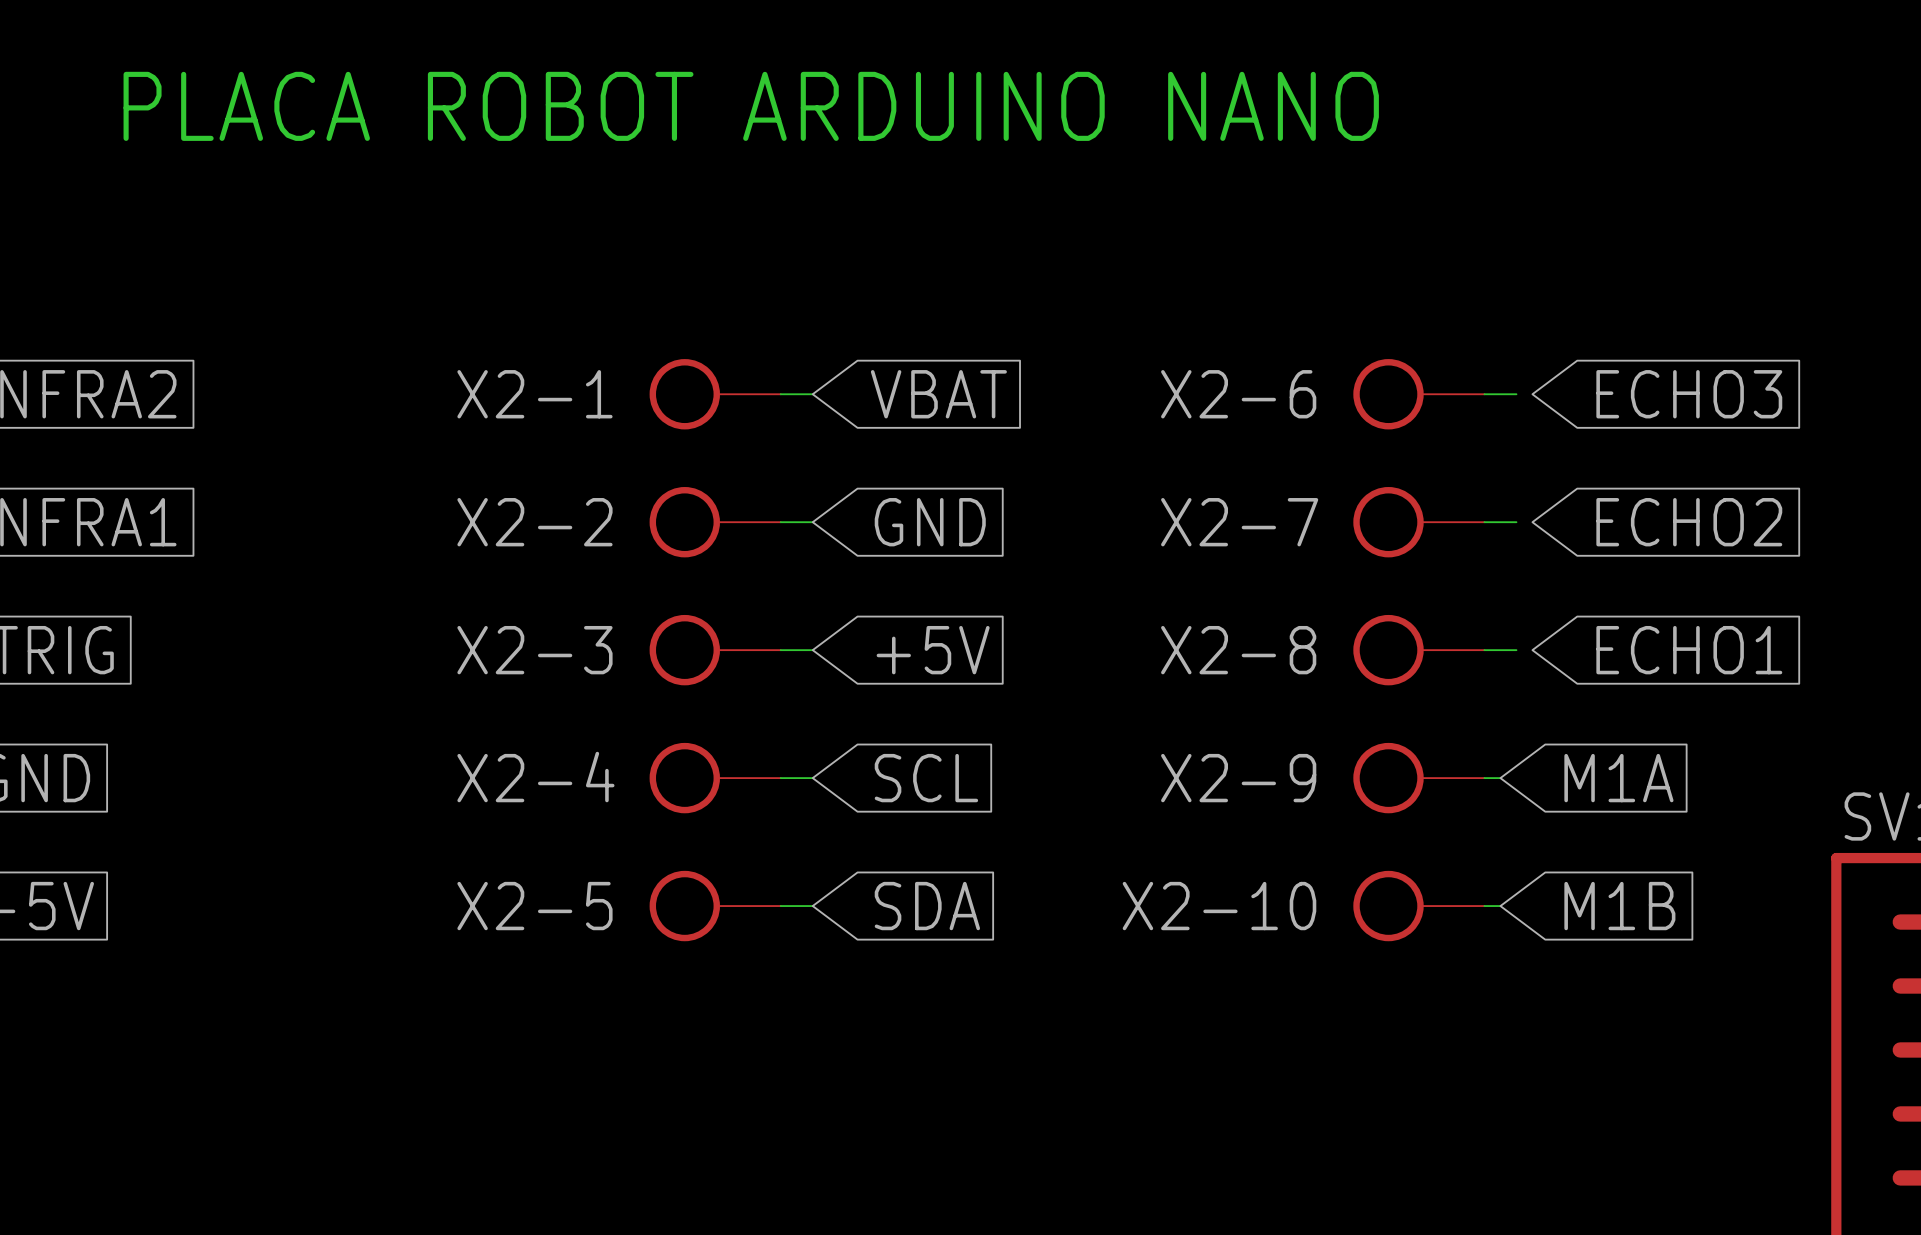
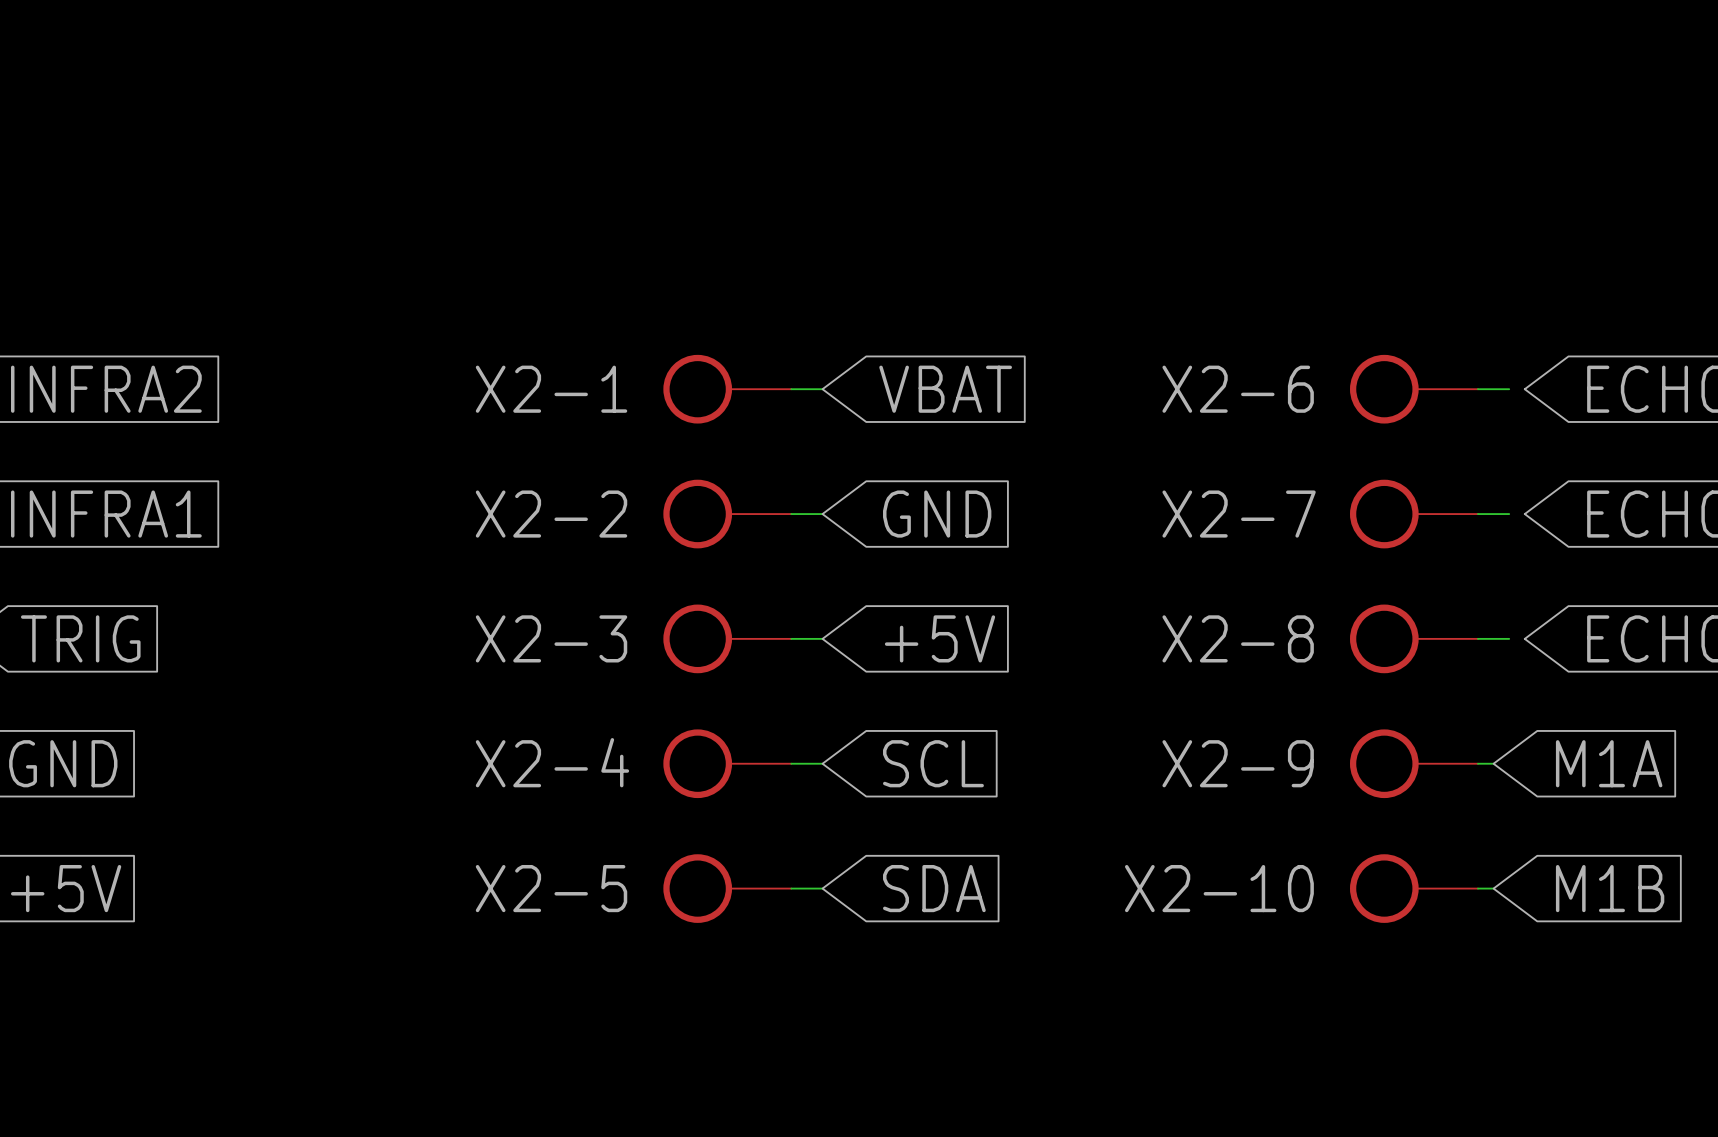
text: PLACA ROBOT ARDUINO NANO (751, 106) -> none

